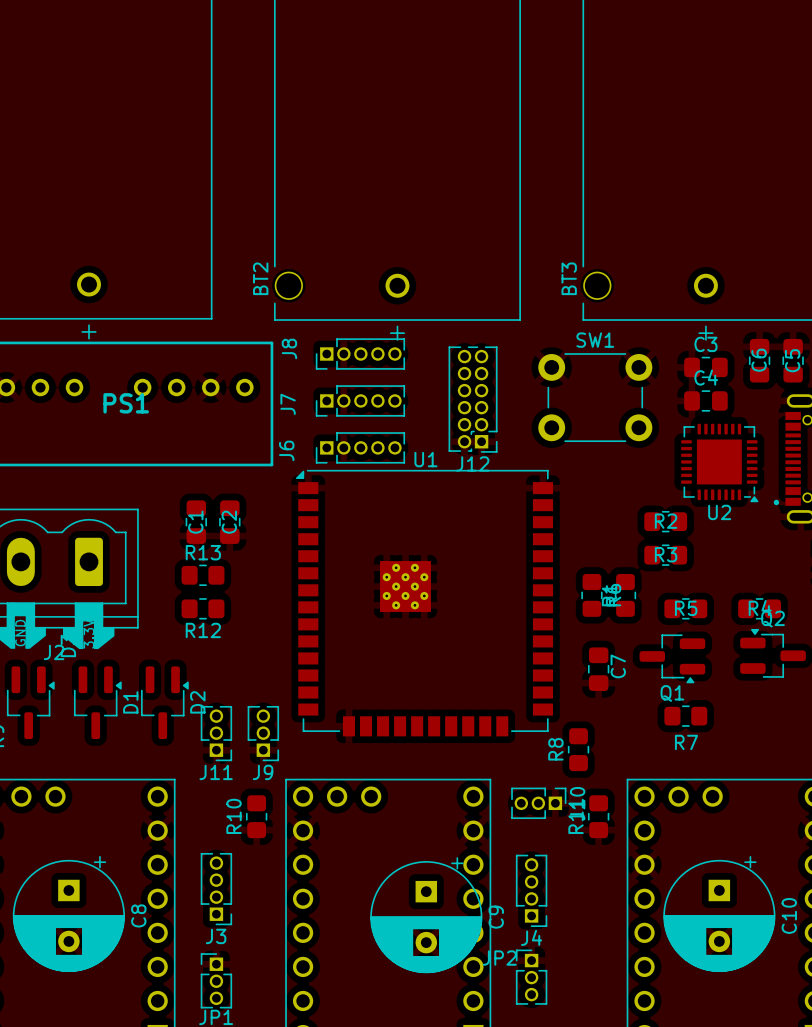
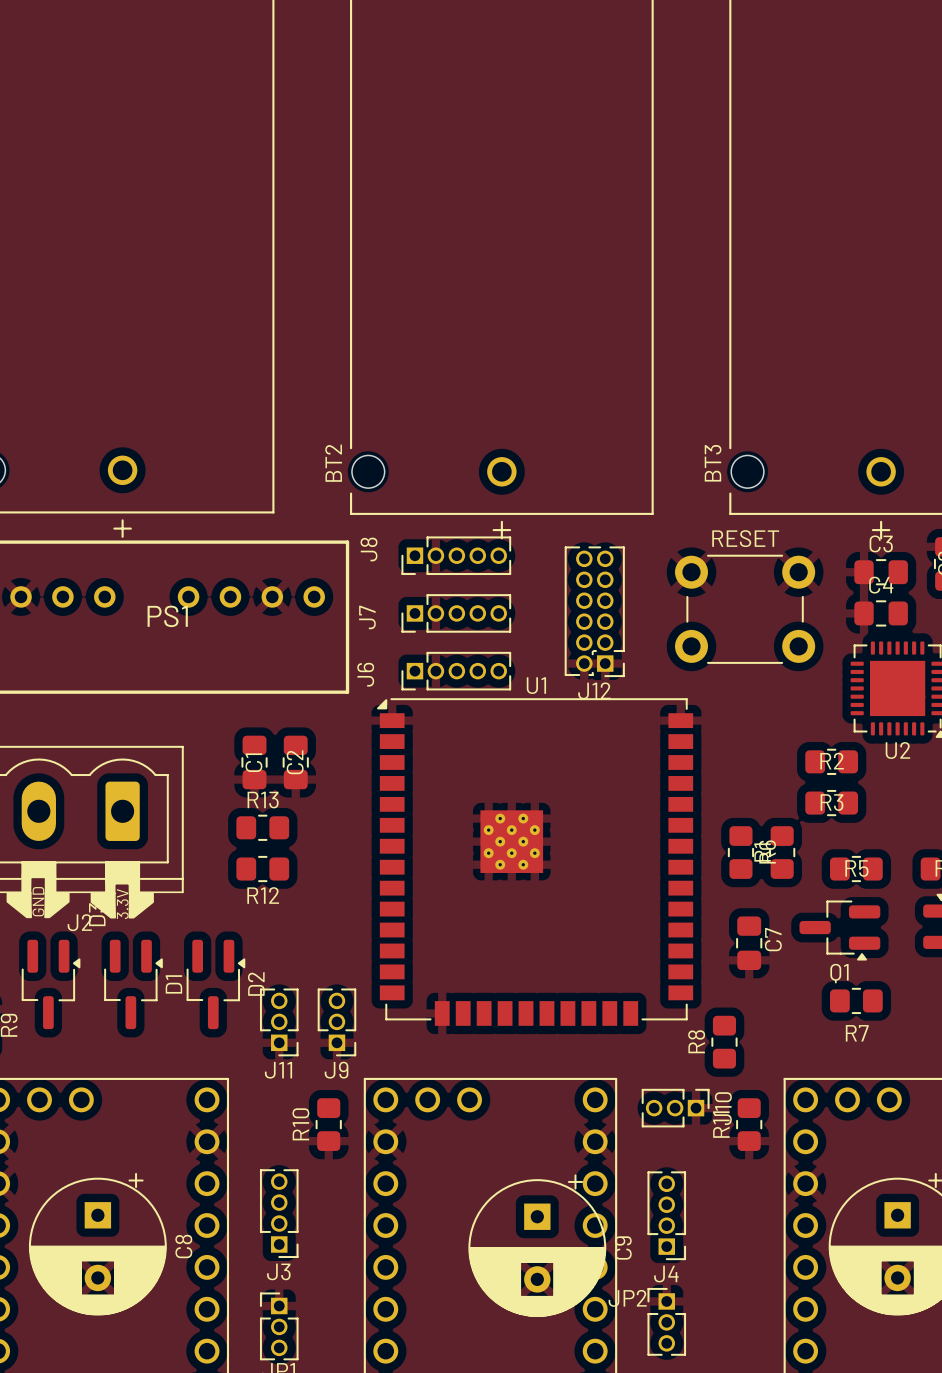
SW1 name: SW1 (595, 340) -> RESET (745, 538)

